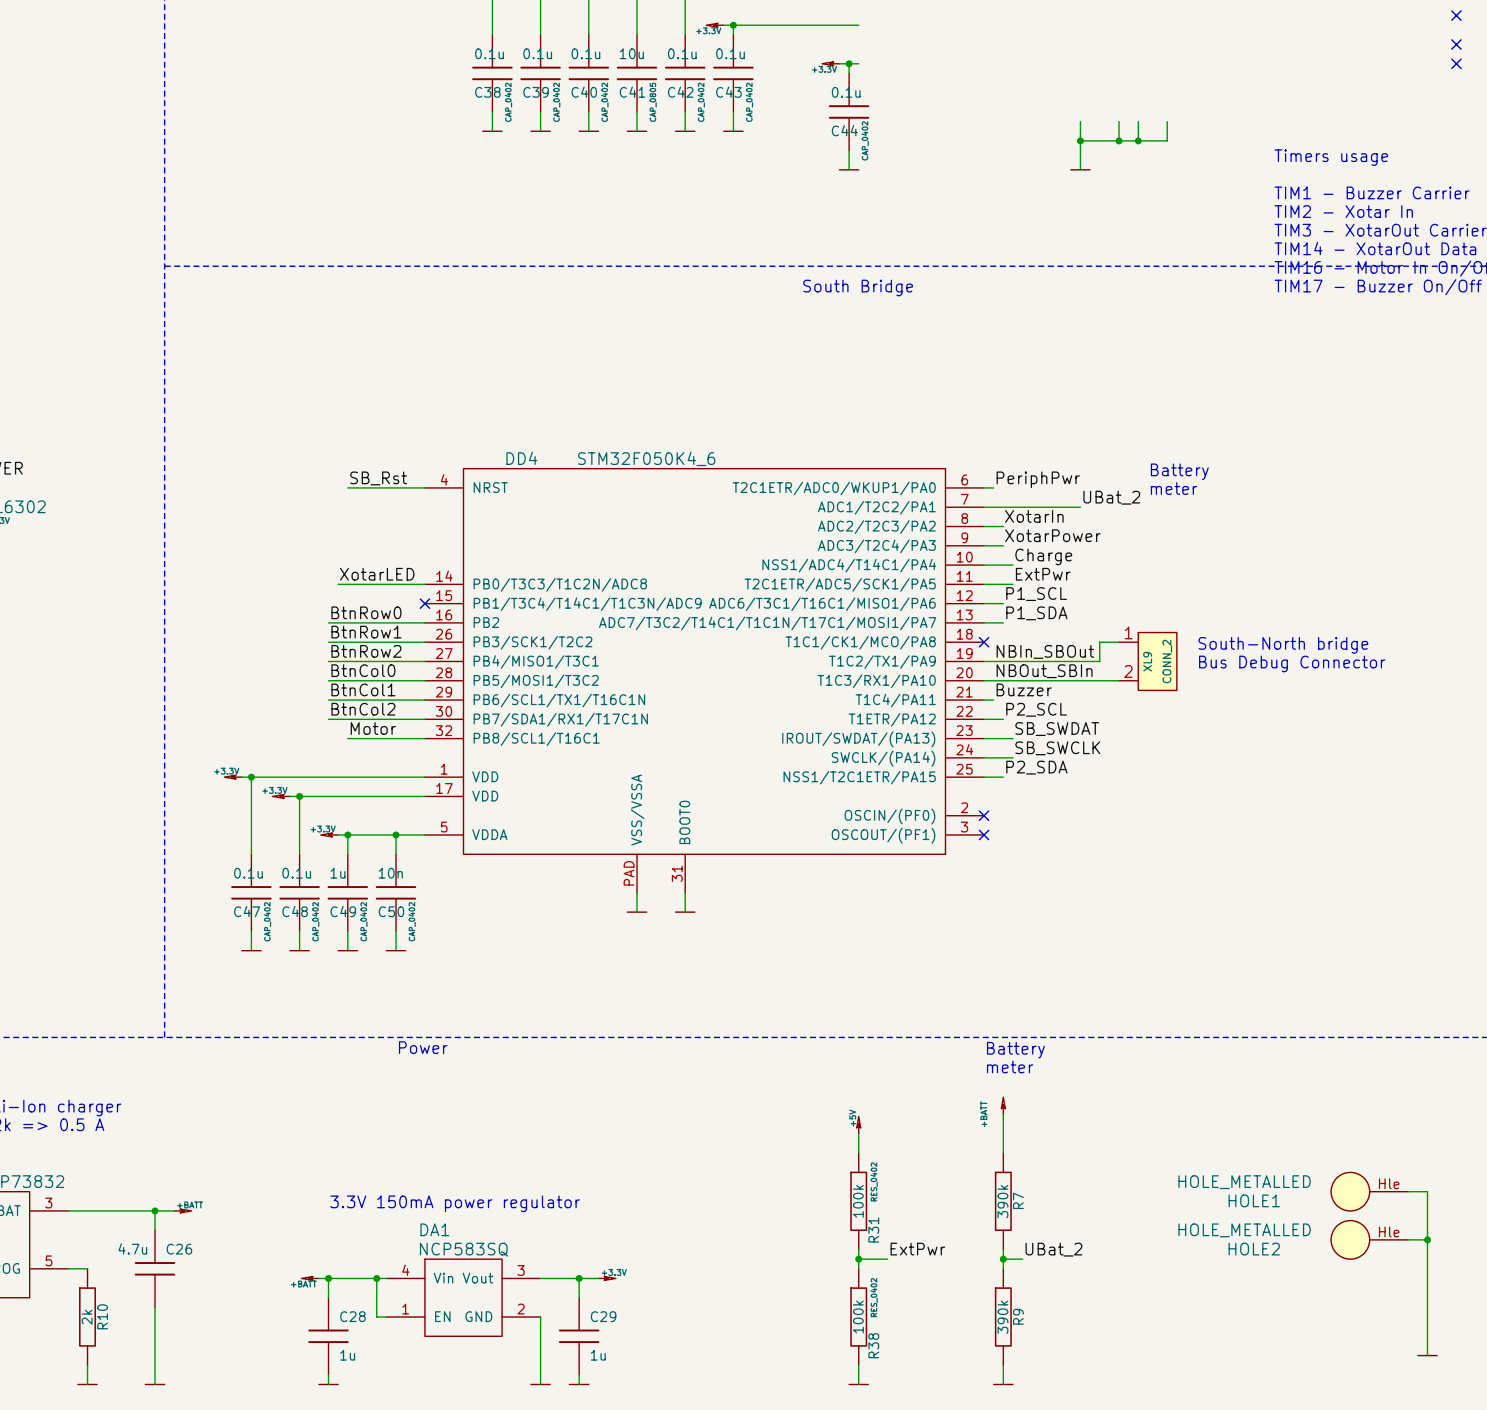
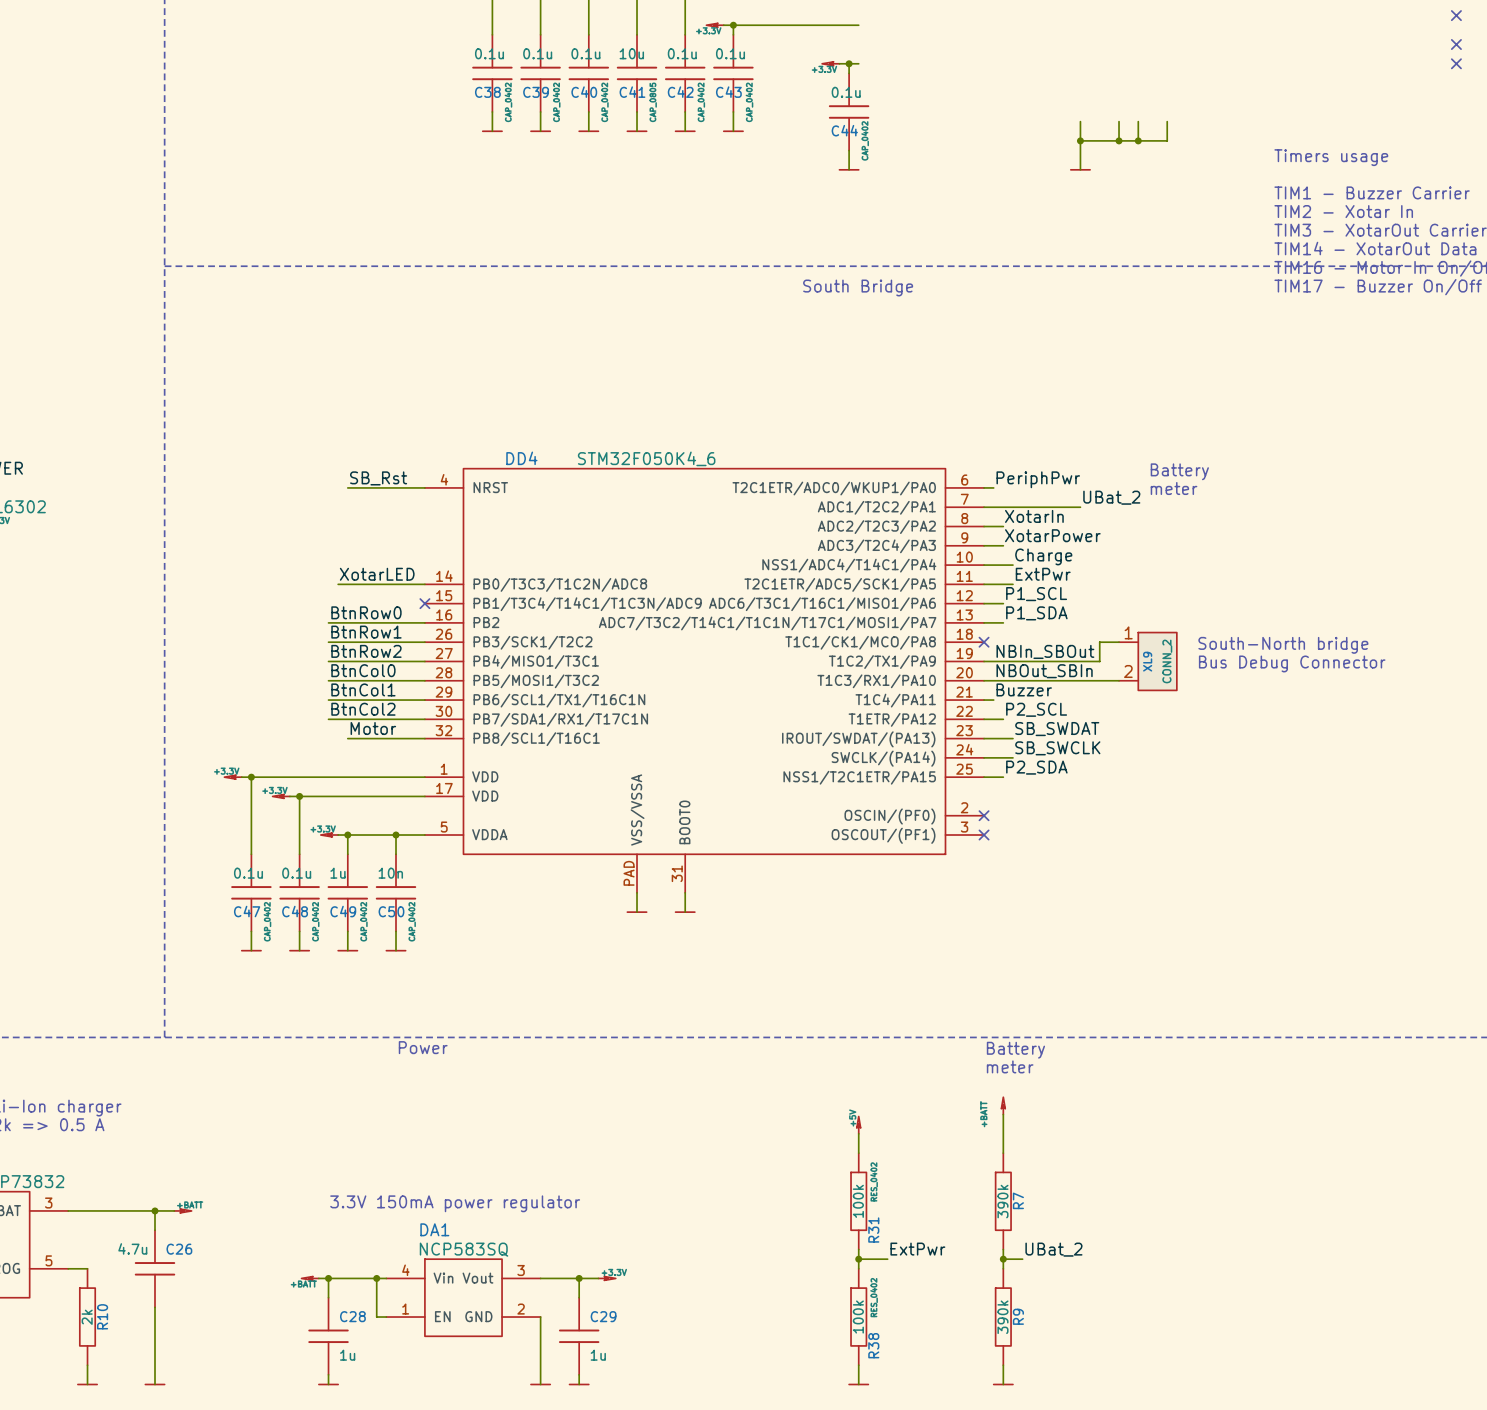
HOLE1: HOLE_METALLED (1369, 1191) -> none
wire: (1408, 1191) (1427, 1191) (1427, 1355) -> none
HOLE2: HOLE_METALLED (1369, 1239) -> none
wire: (1408, 1239) (1427, 1239) -> none
junction: (1427, 1239) -> none
power symbol: (1427, 1355) -> none

